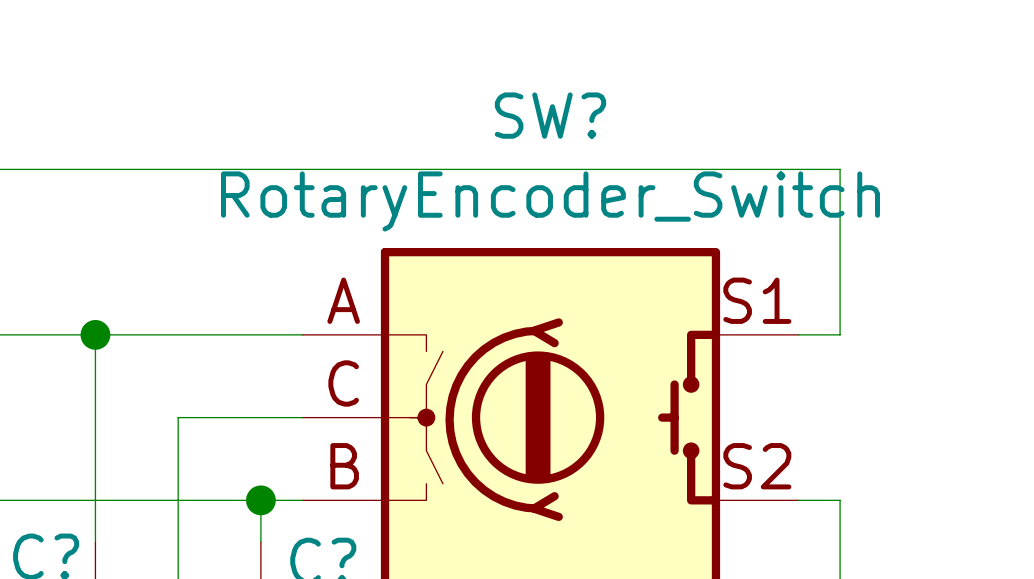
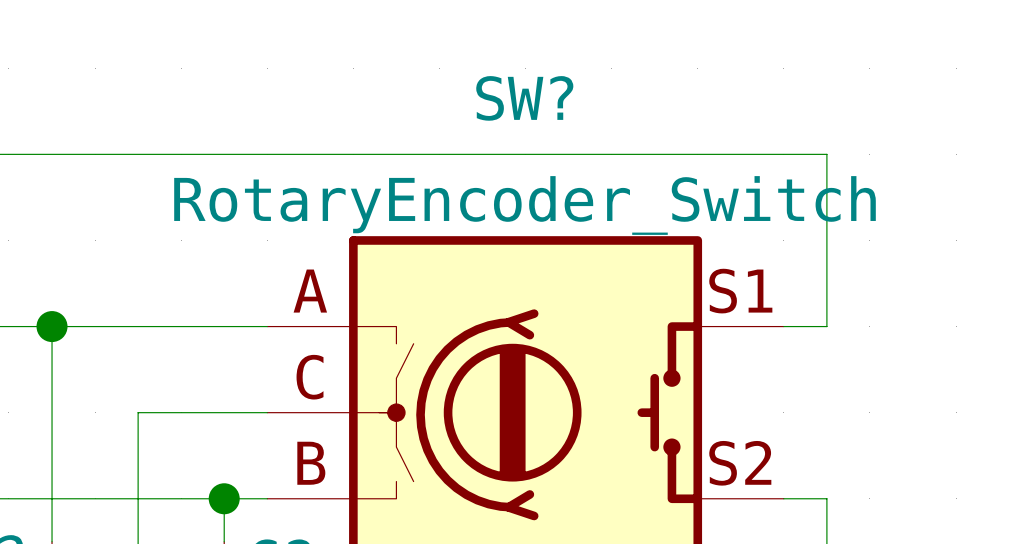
SW? value position: RotaryEncoder_Switch (550, 201) -> RotaryEncoder_Switch (525, 205)

